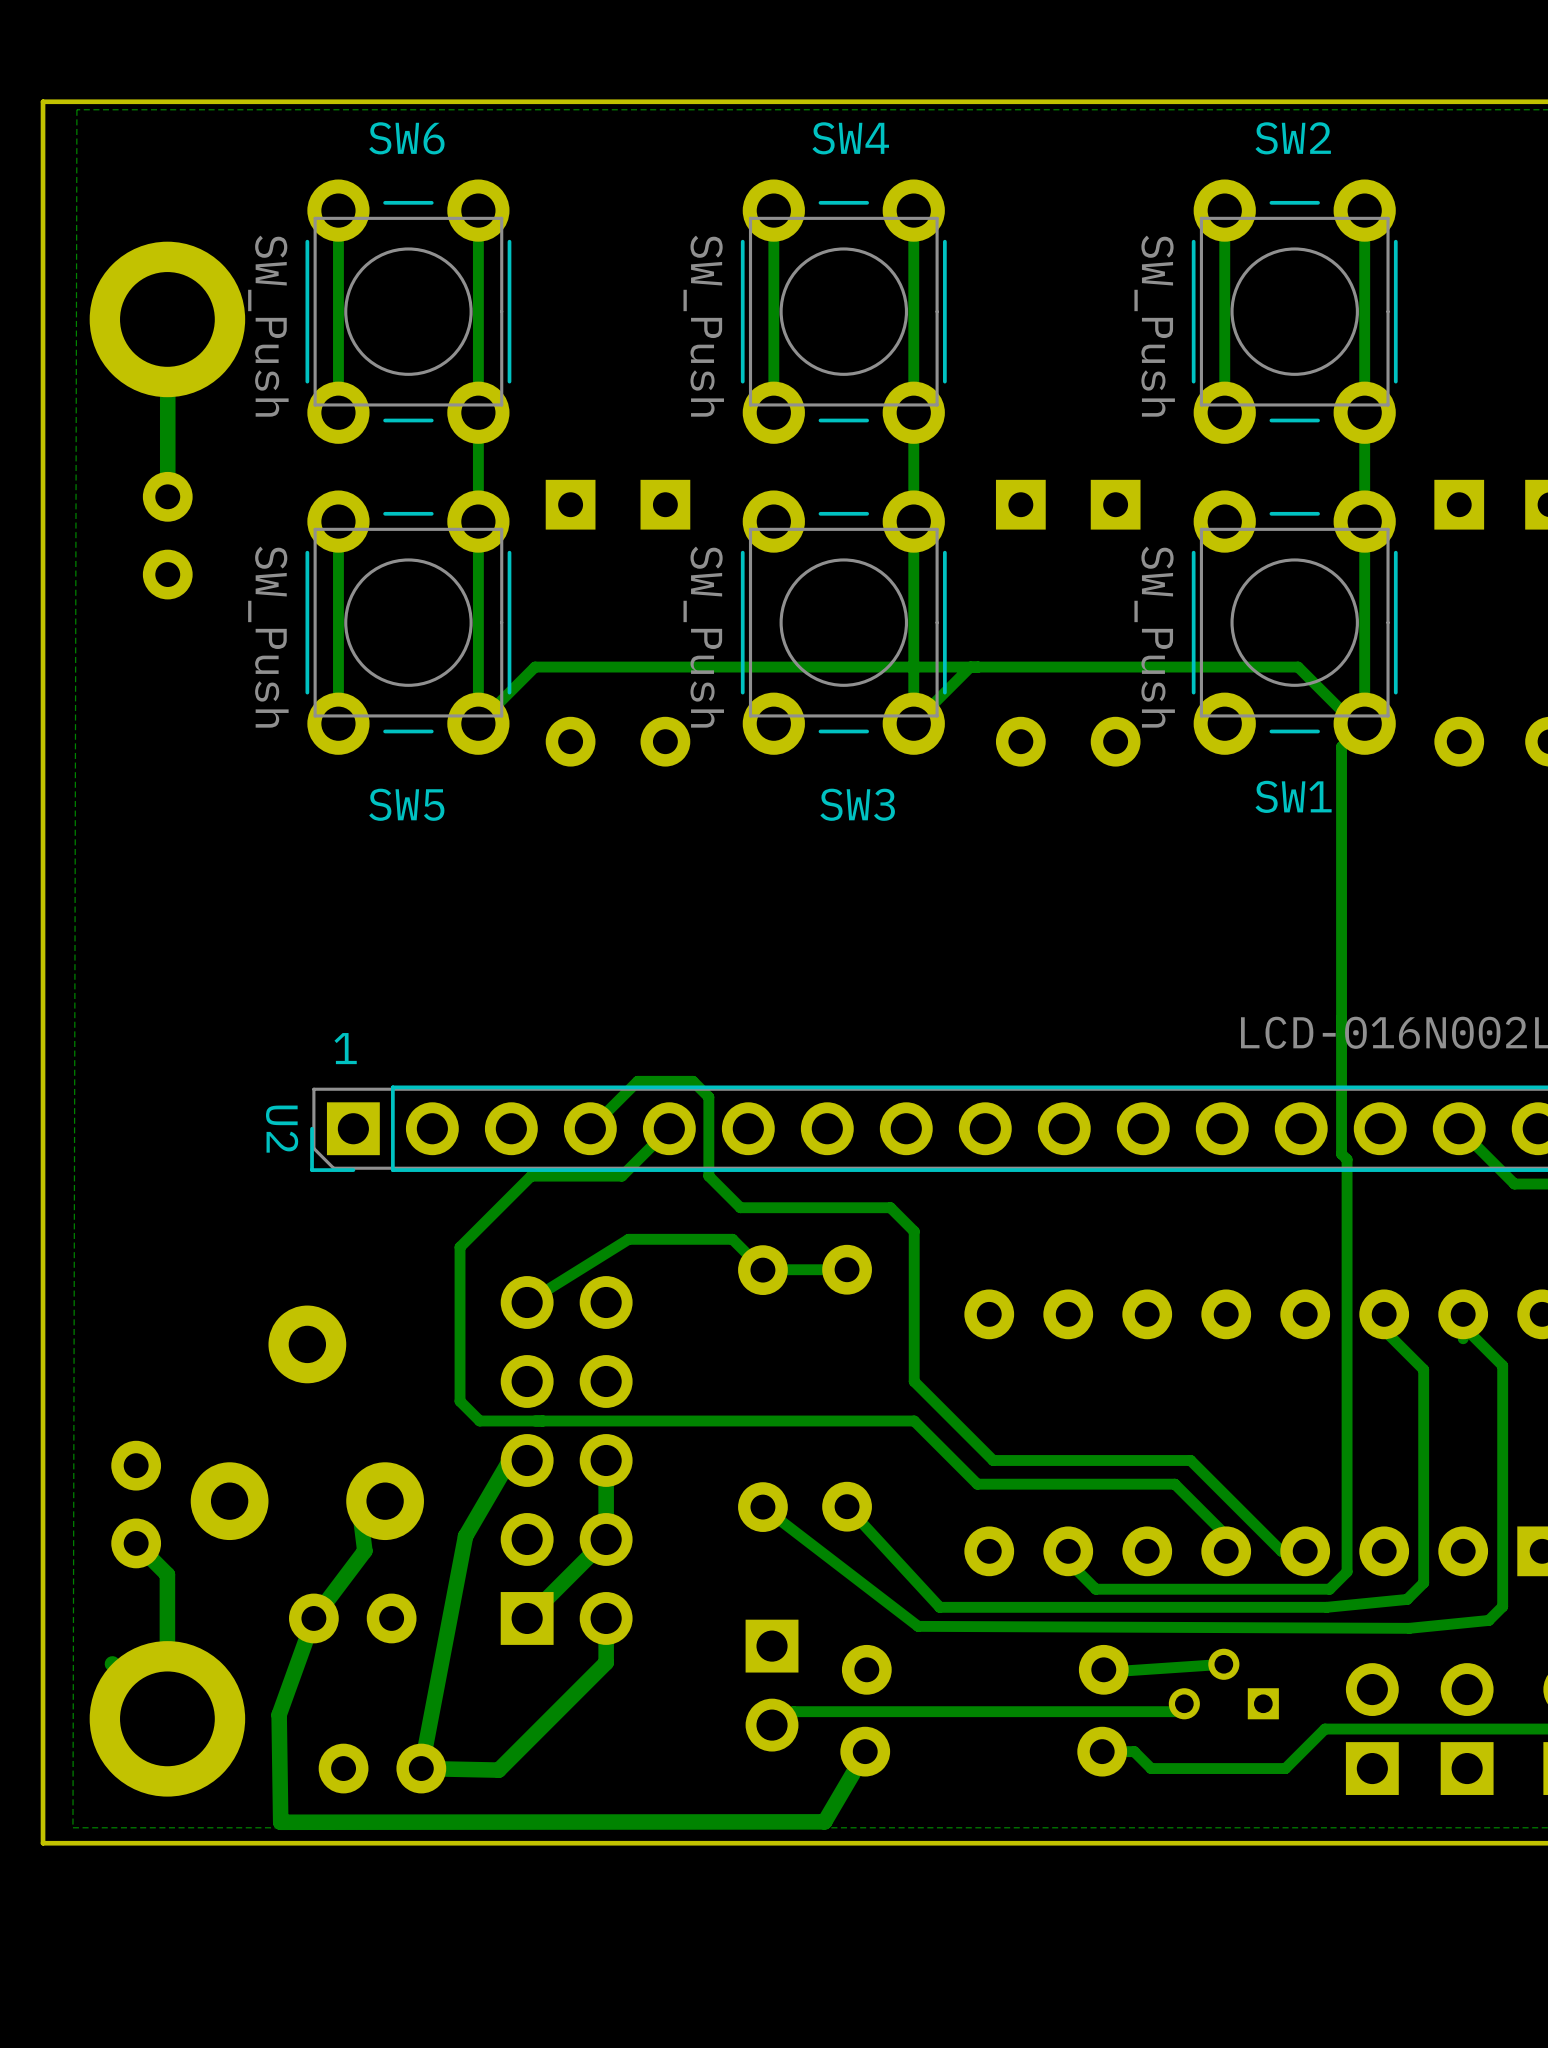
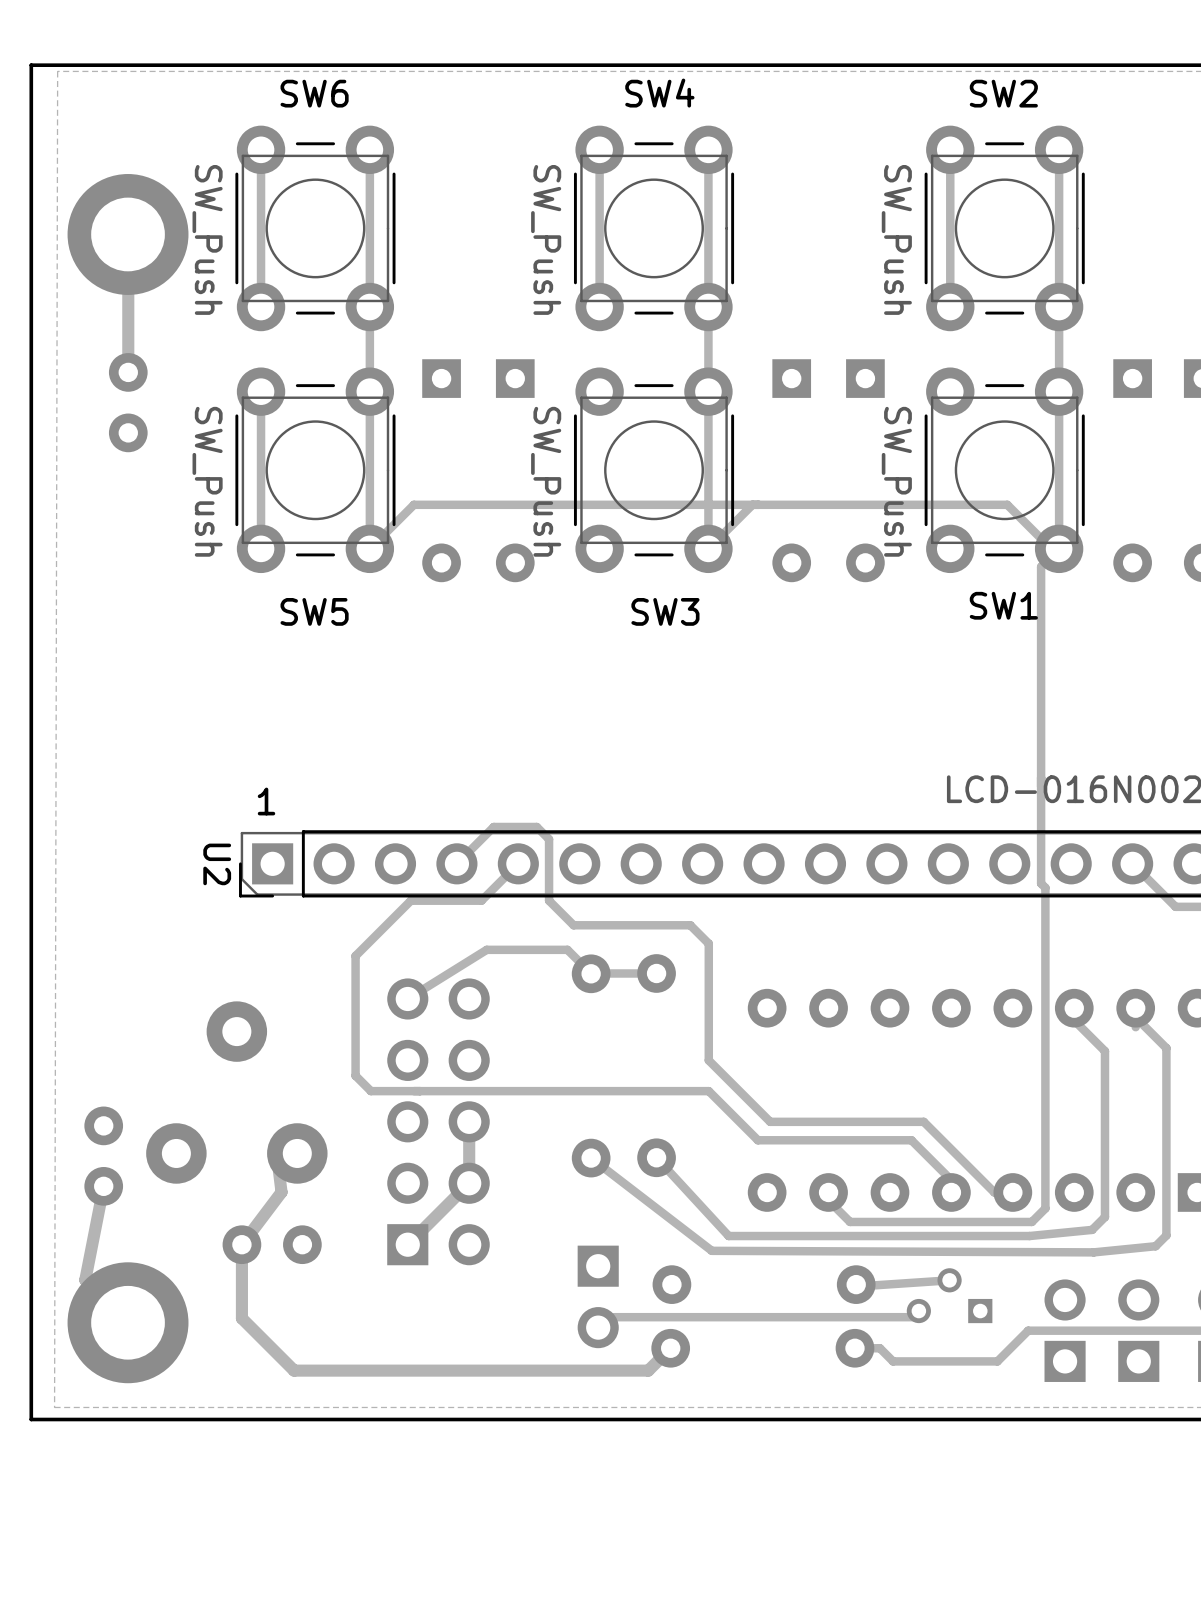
track: (527, 1460) (509, 1460) (465, 1536) (421, 1768) (498, 1770) (606, 1662) (606, 1618) -> none
track: (136, 1543) (167, 1574) (167, 1718) -> (103, 1186) (85, 1280)
track: (313, 1618) (279, 1714) (280, 1822) (824, 1821) (866, 1750) -> (241, 1244) (241, 1318) (294, 1370) (648, 1370) (671, 1347)
part: (382, 1768) -> none

